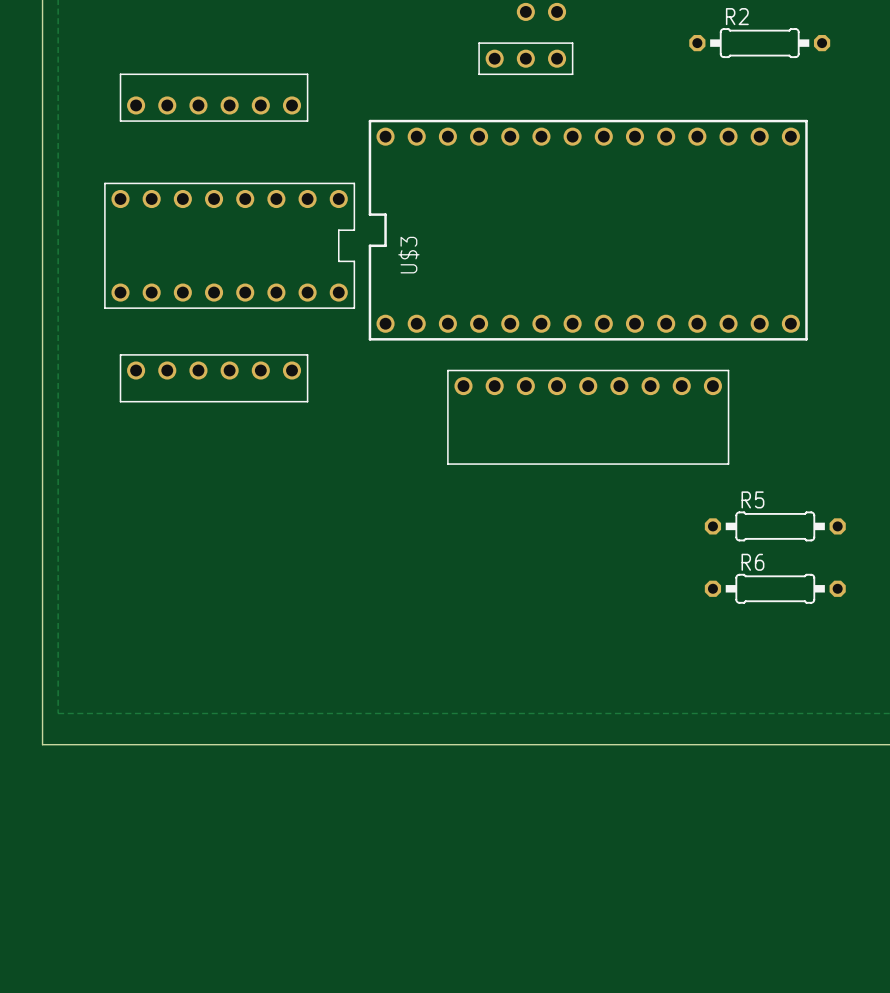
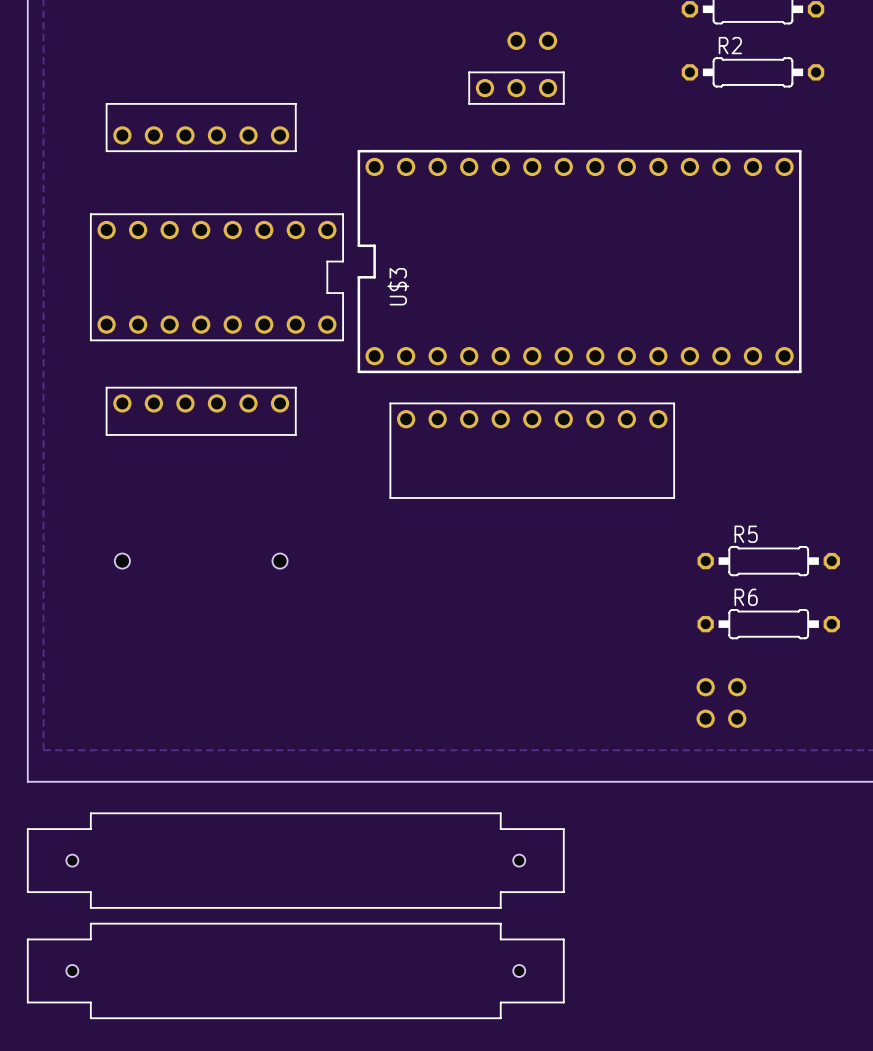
part position: (588, 417) -> (532, 450)
part: none -> (122, 561)
part: none -> (280, 561)
part: none -> (721, 687)
part: none -> (721, 718)
part: none -> (295, 860)
part: none -> (295, 970)

